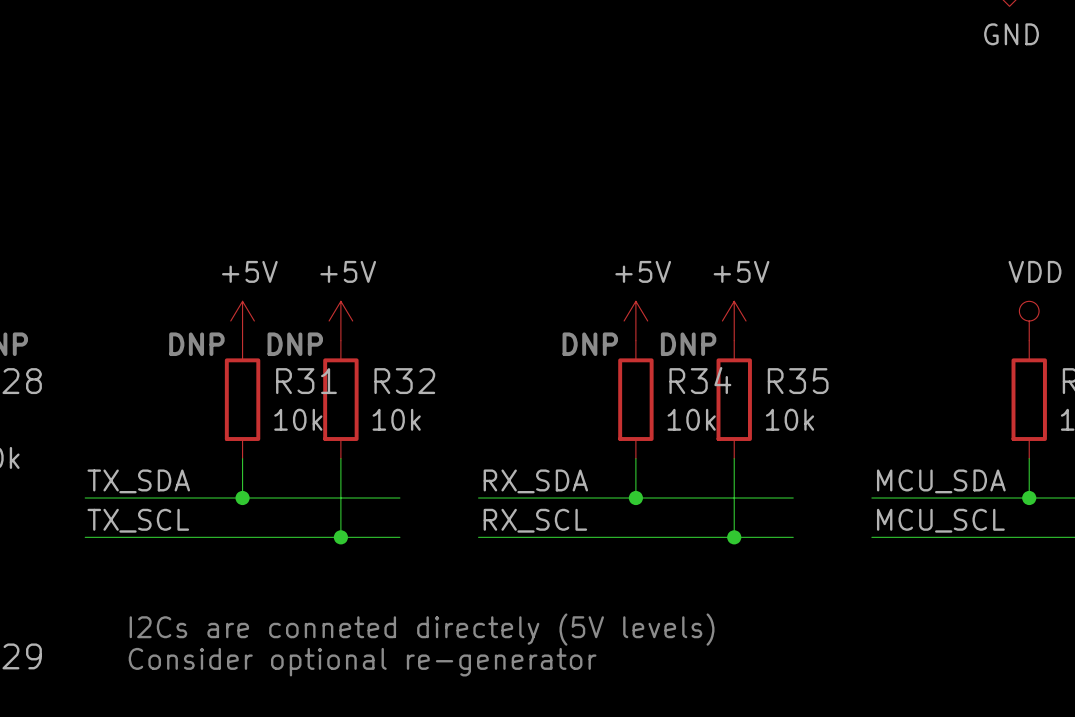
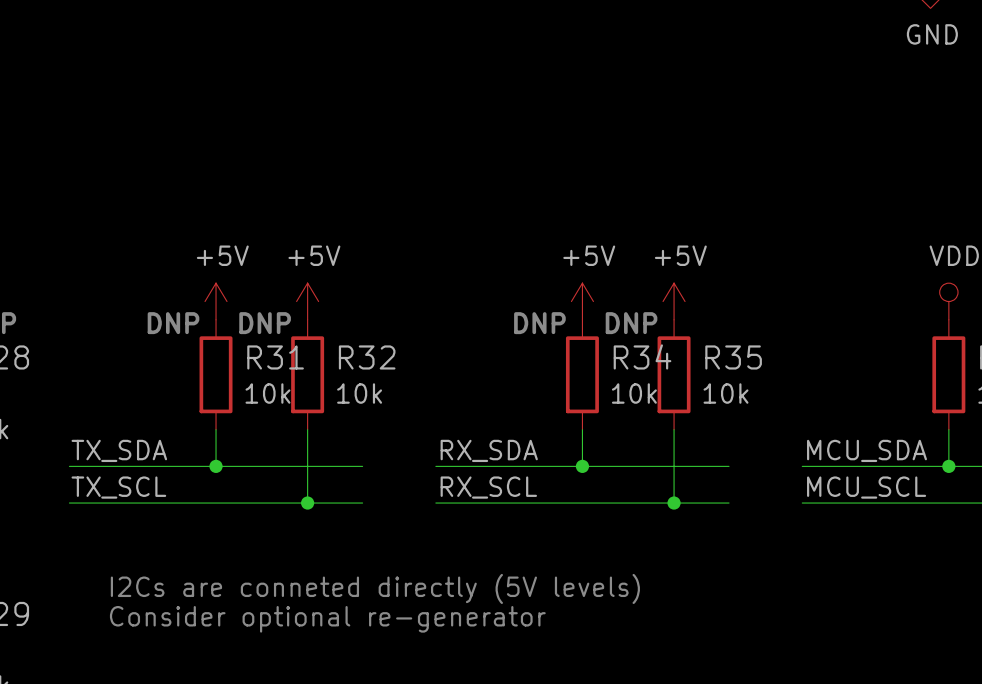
text: I2Cs are conneted directely (5V levels) (422, 629) -> I2Cs are conneted directly (5V levels) (375, 588)

